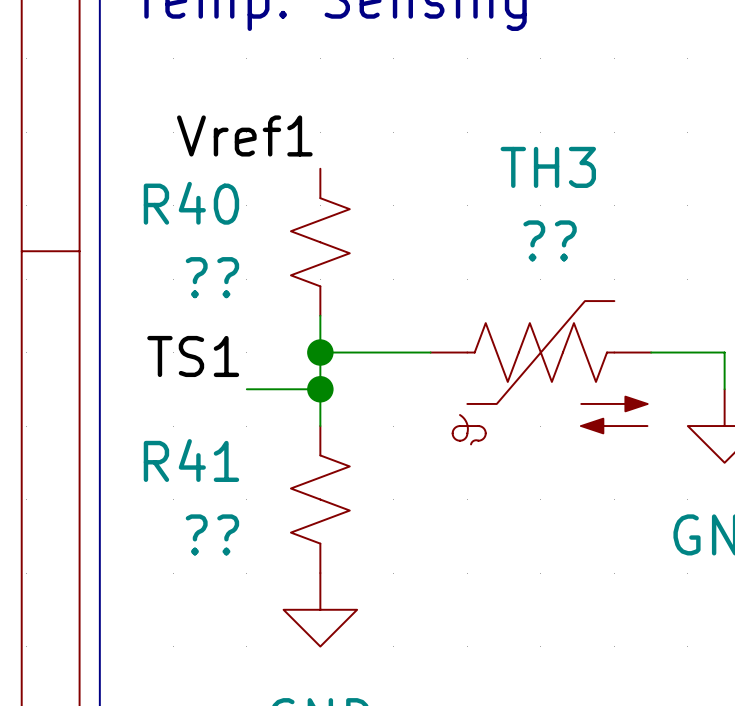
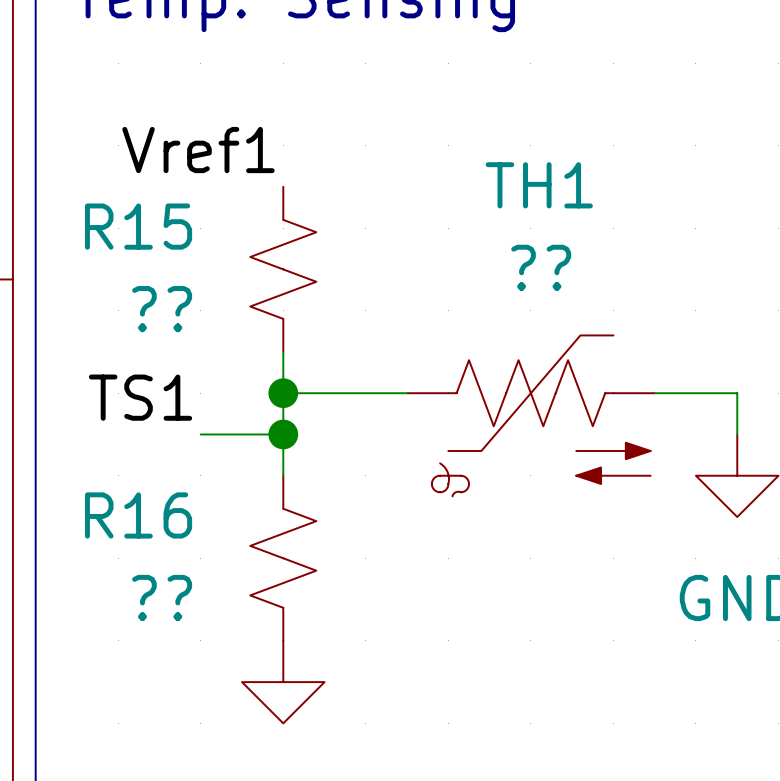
TH3 name: TH3 (548, 167) -> TH1 (539, 185)
R40 name: R40 (191, 203) -> R15 (138, 226)
R41 name: R41 (191, 460) -> R16 (138, 515)

